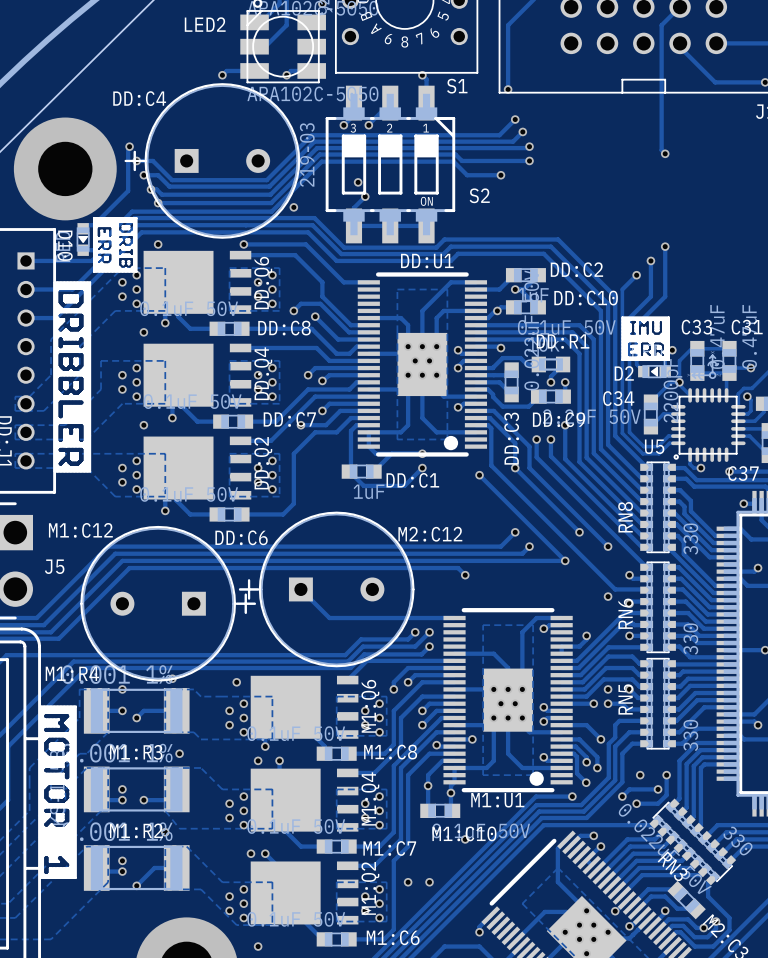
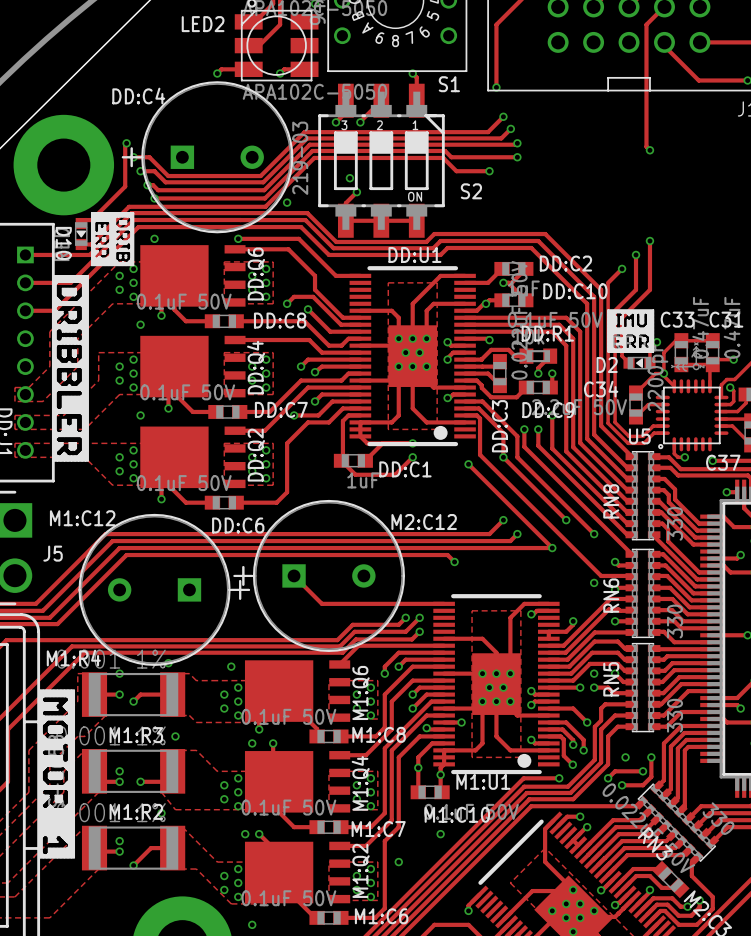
via: (465, 839) -> none
via: none -> (440, 834)
via: (429, 882) -> none

